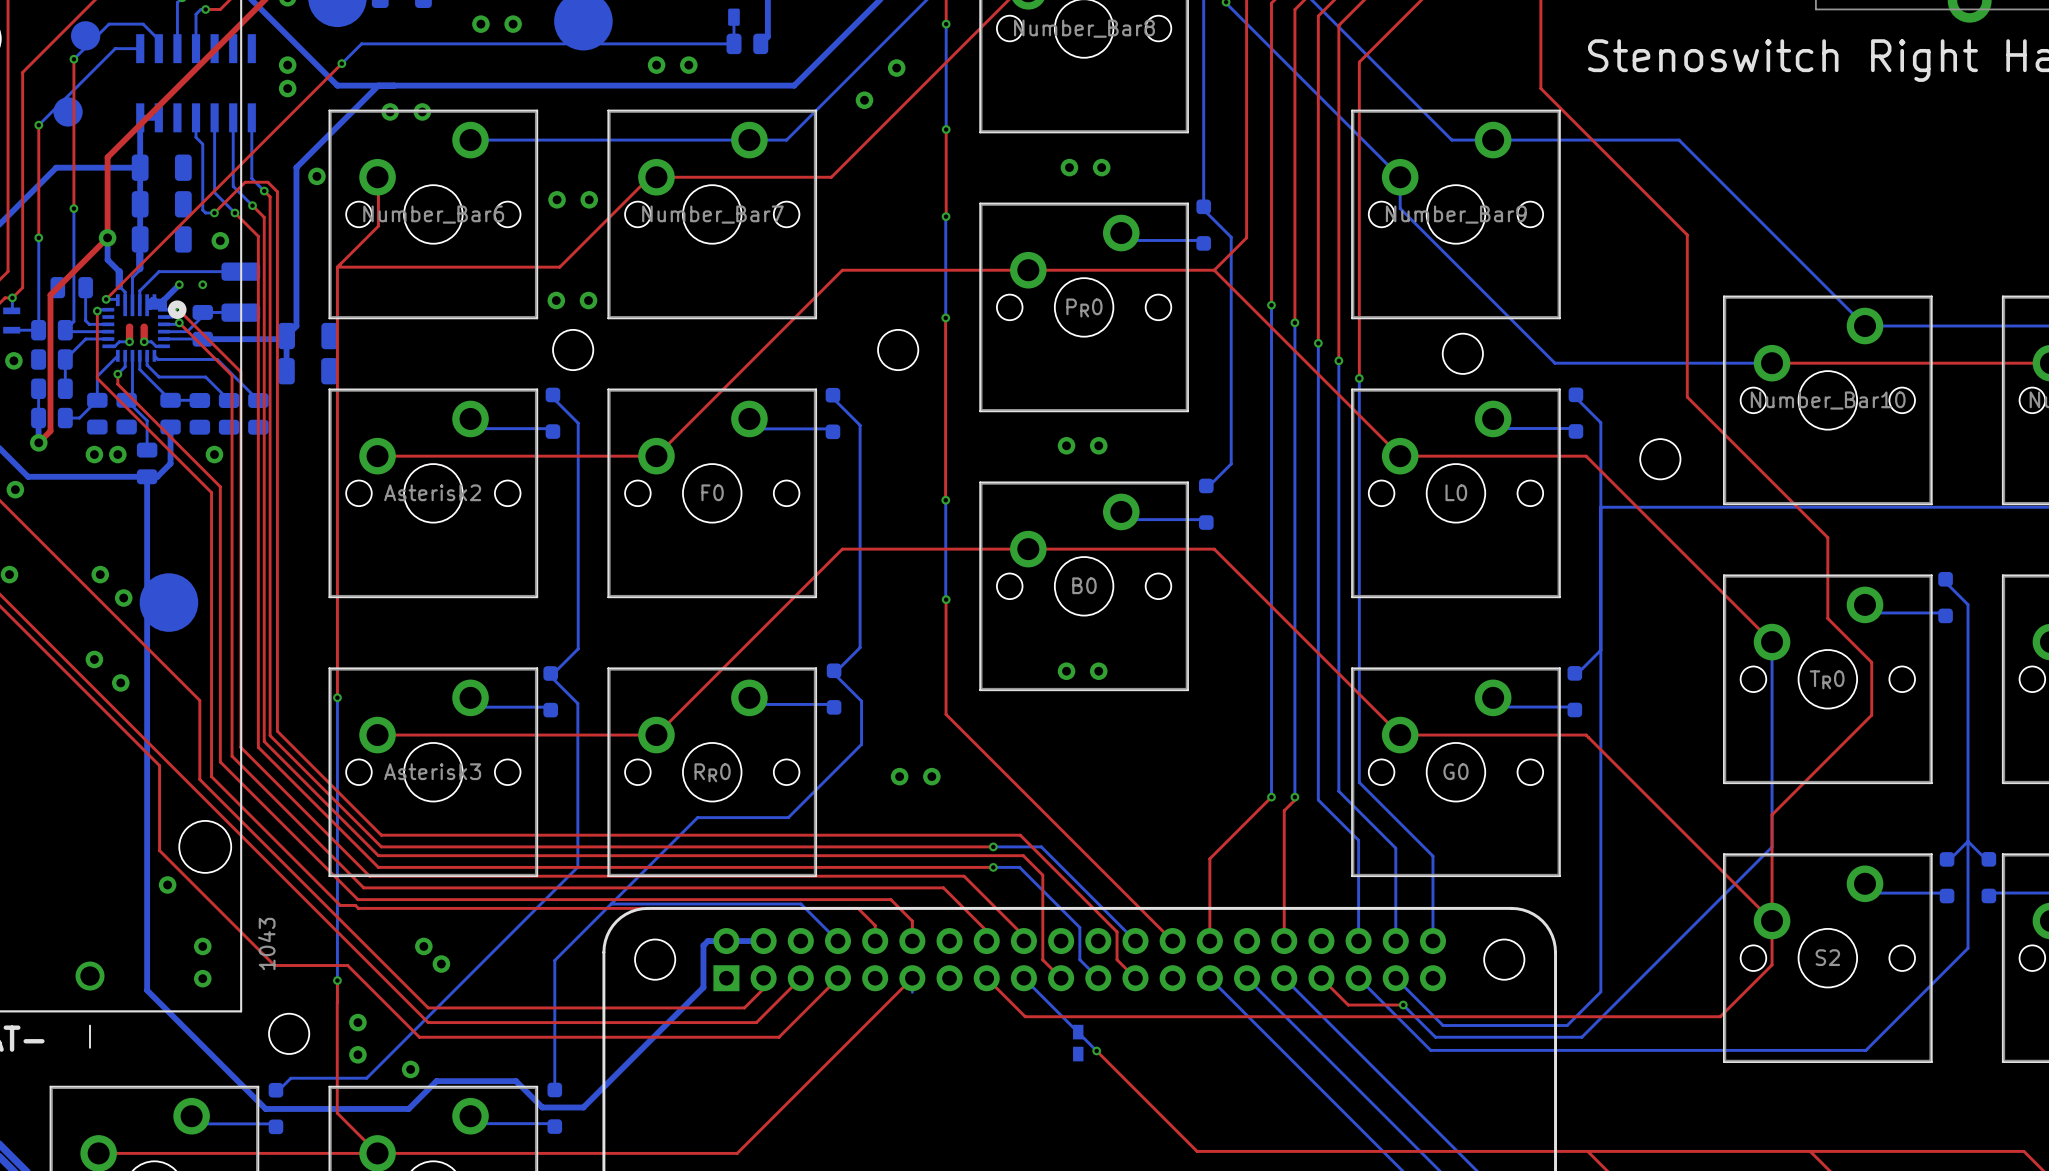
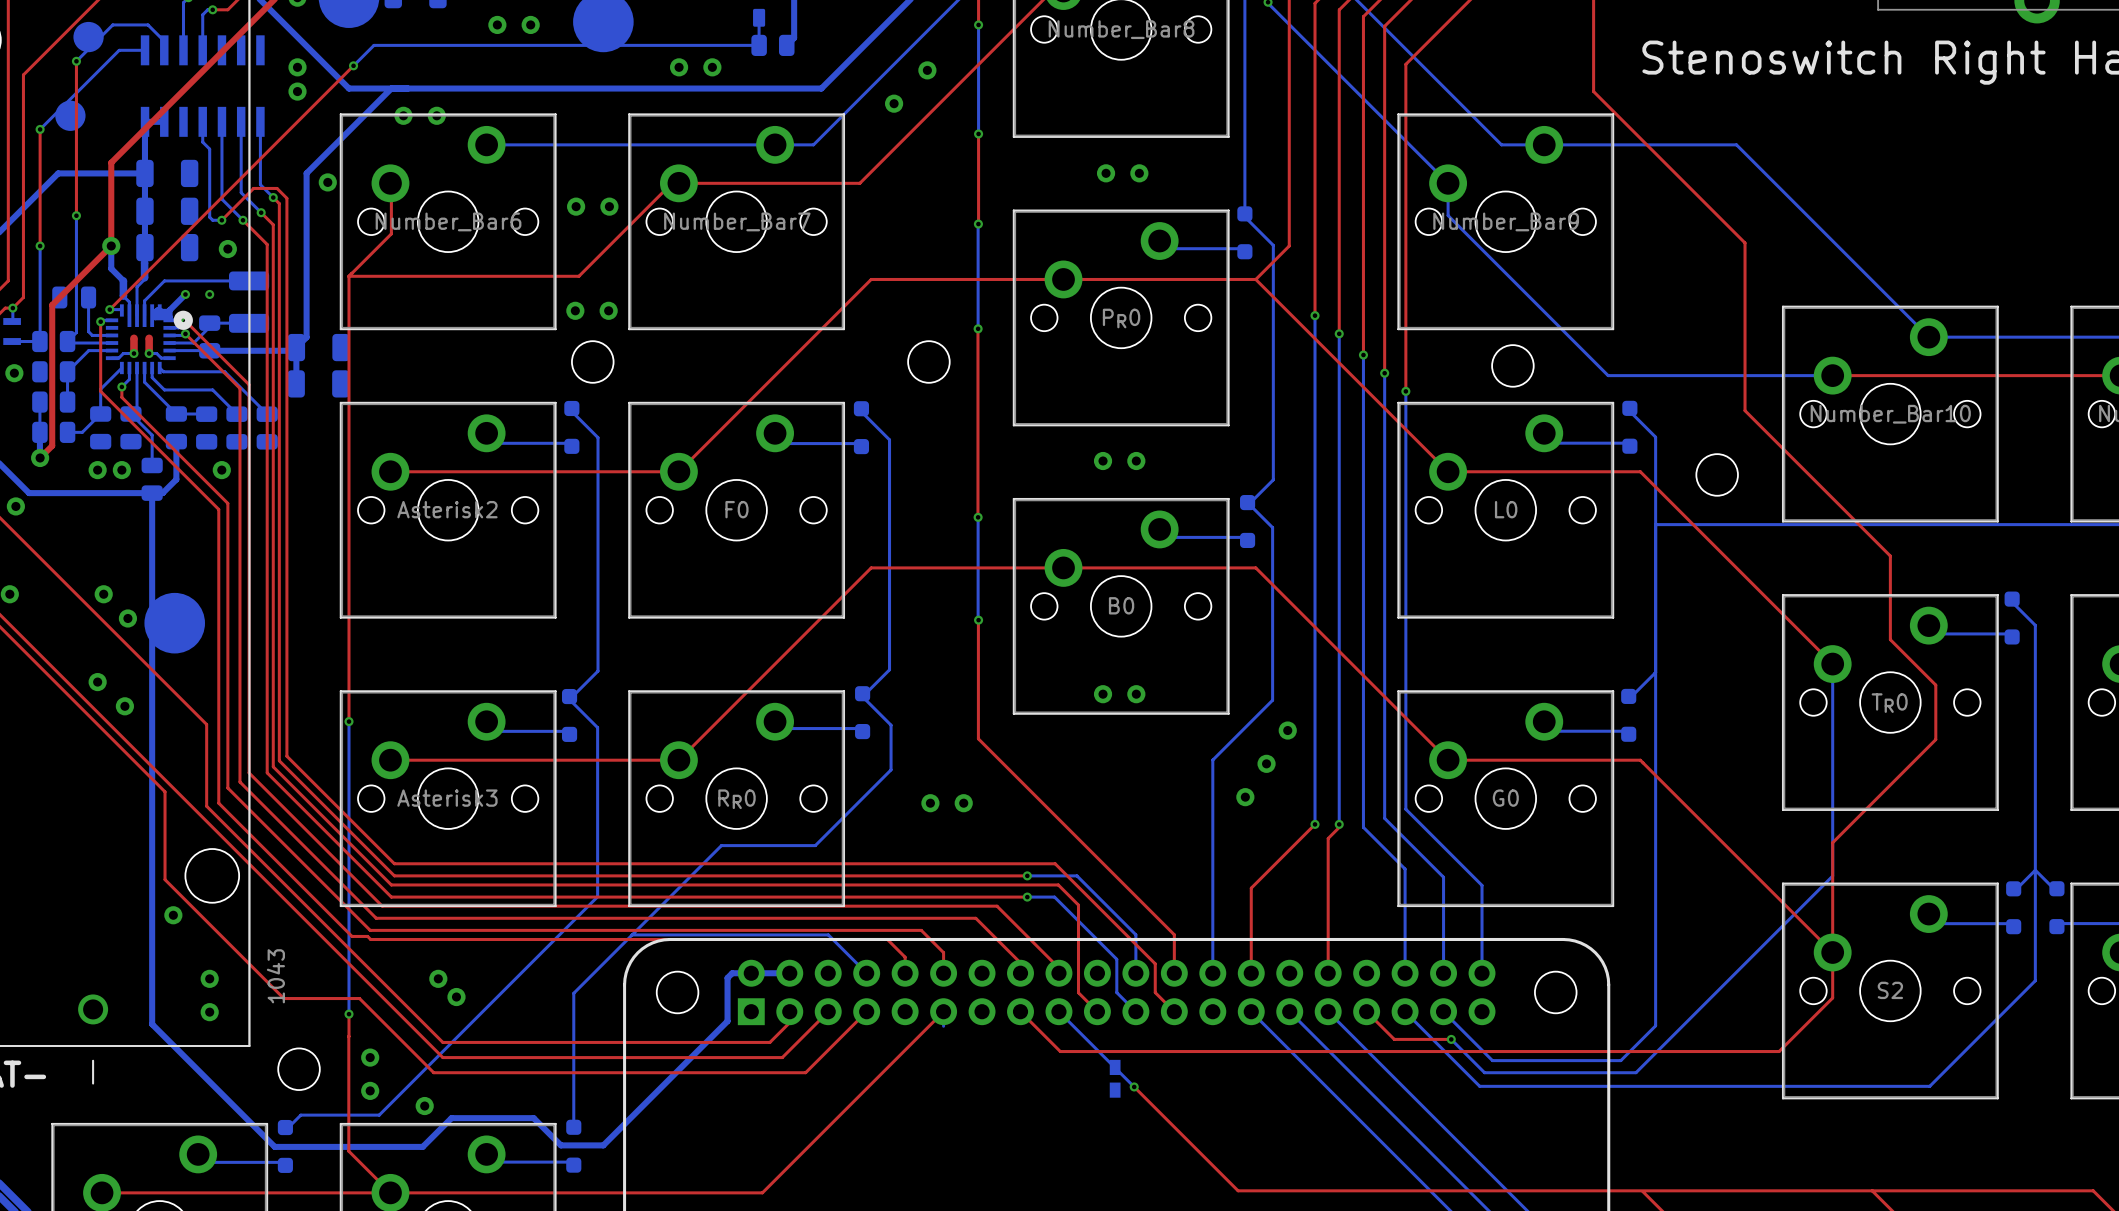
bottom track: none -> (1247, 502) (1272, 527) (1272, 700) (1212, 760) (1212, 973)
via: none -> (1287, 730)
via: none -> (1266, 763)
via: none -> (1245, 797)
bottom track: (1098, 903) (1135, 941) -> (1135, 934) (1135, 973)
top track: (1135, 903) (1172, 941) -> (1174, 934) (1174, 973)

